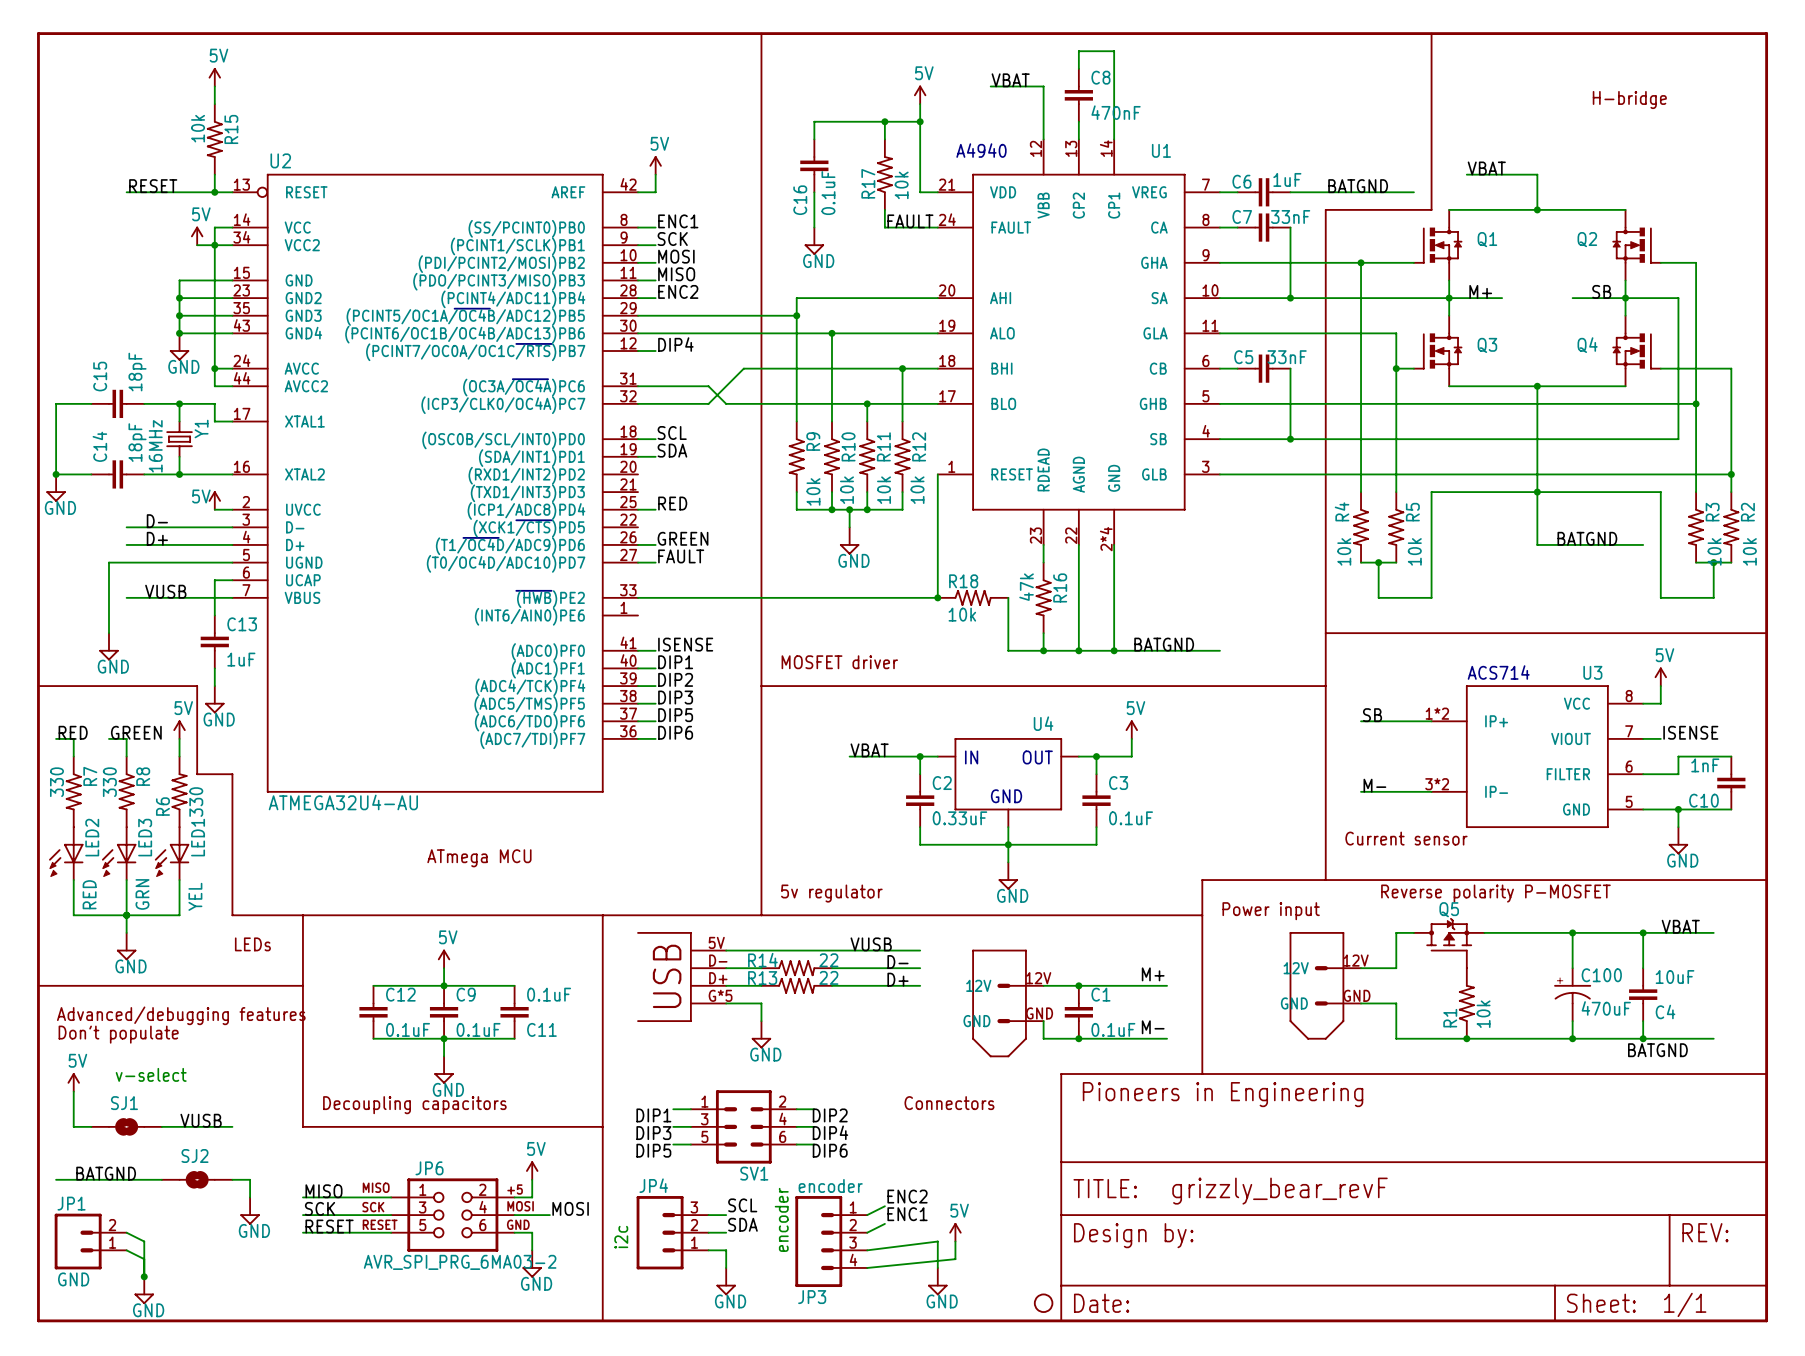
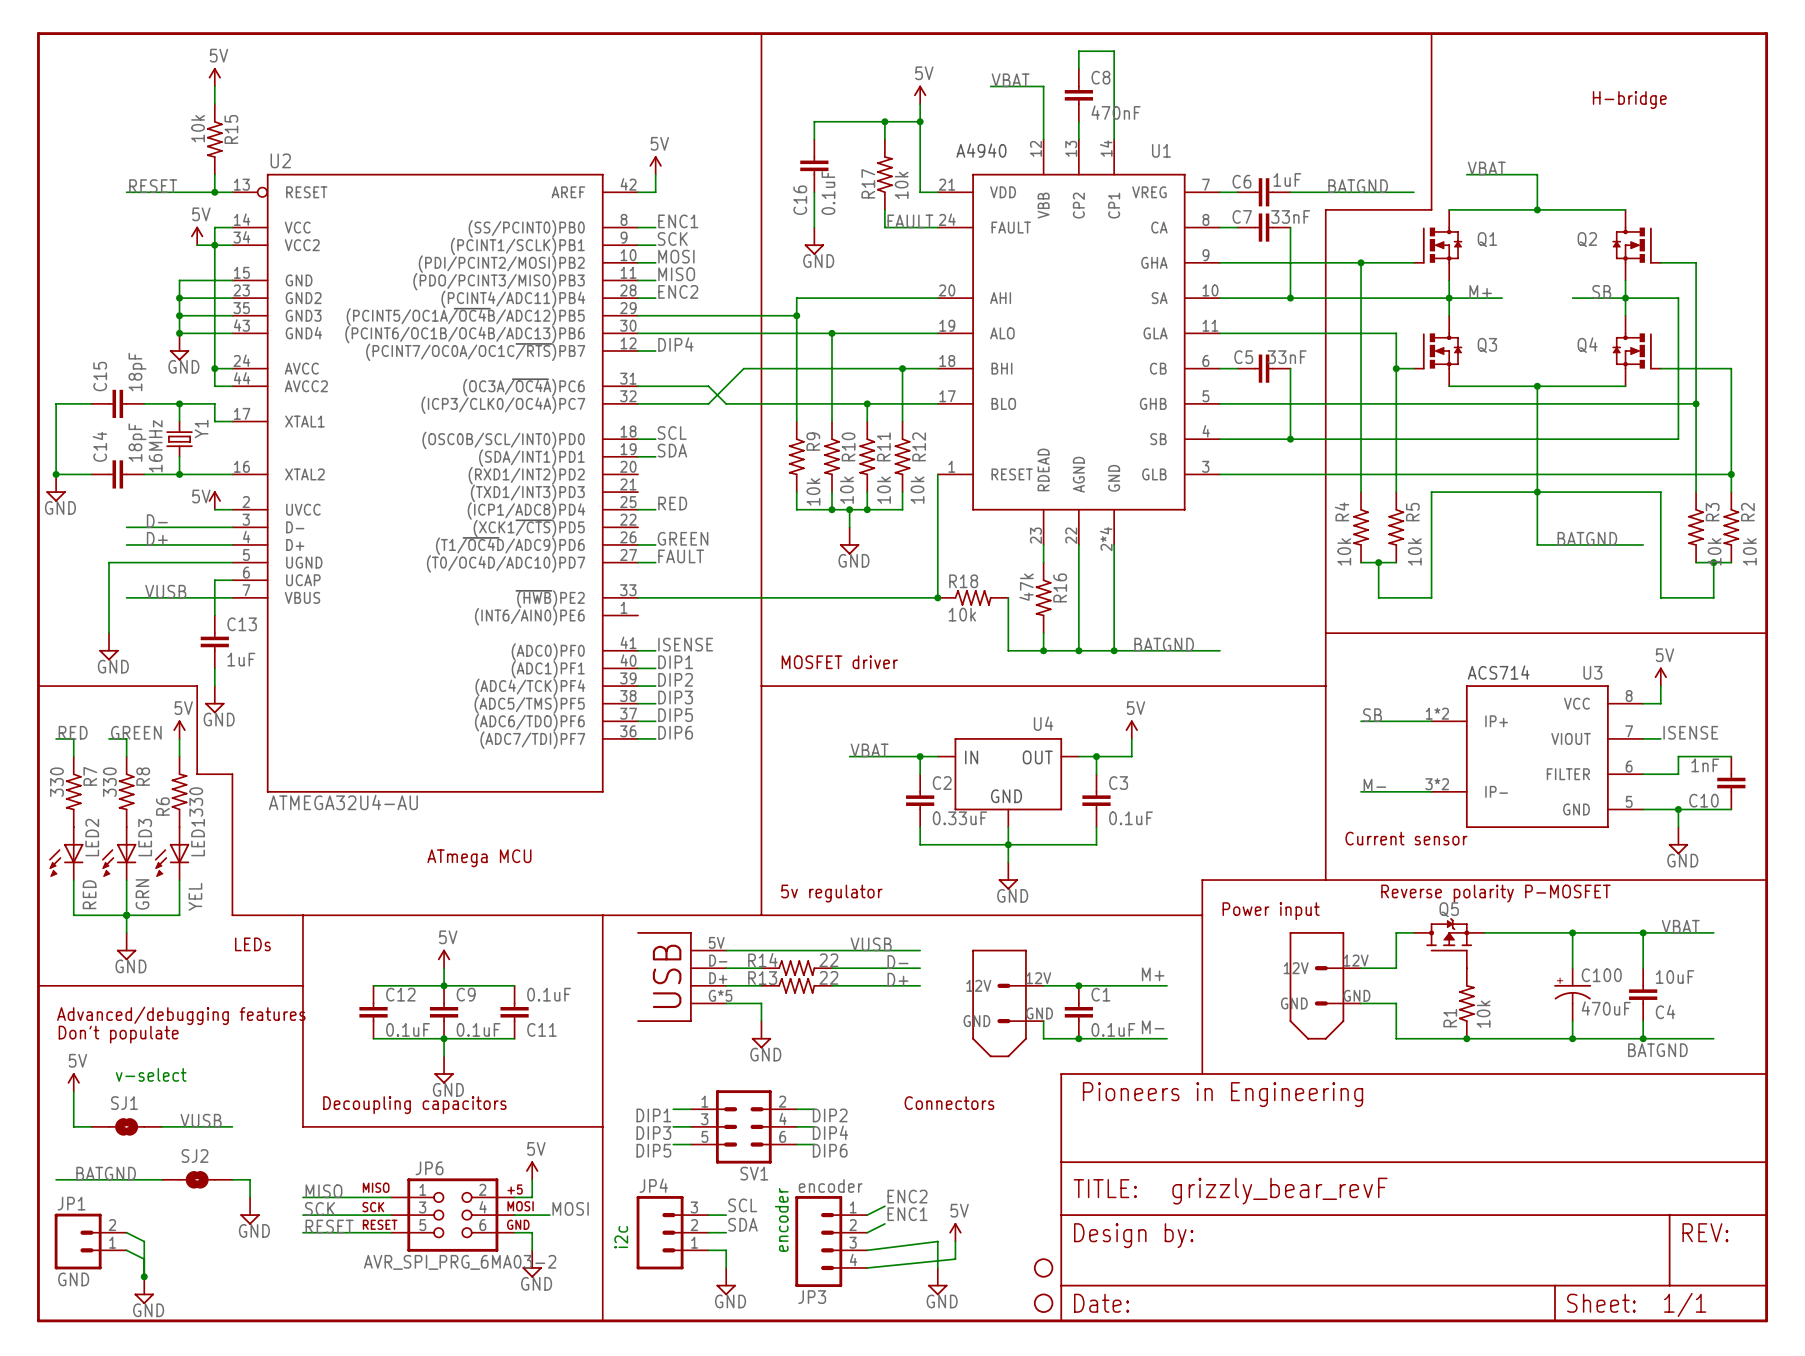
part: none -> (1043, 1267)

